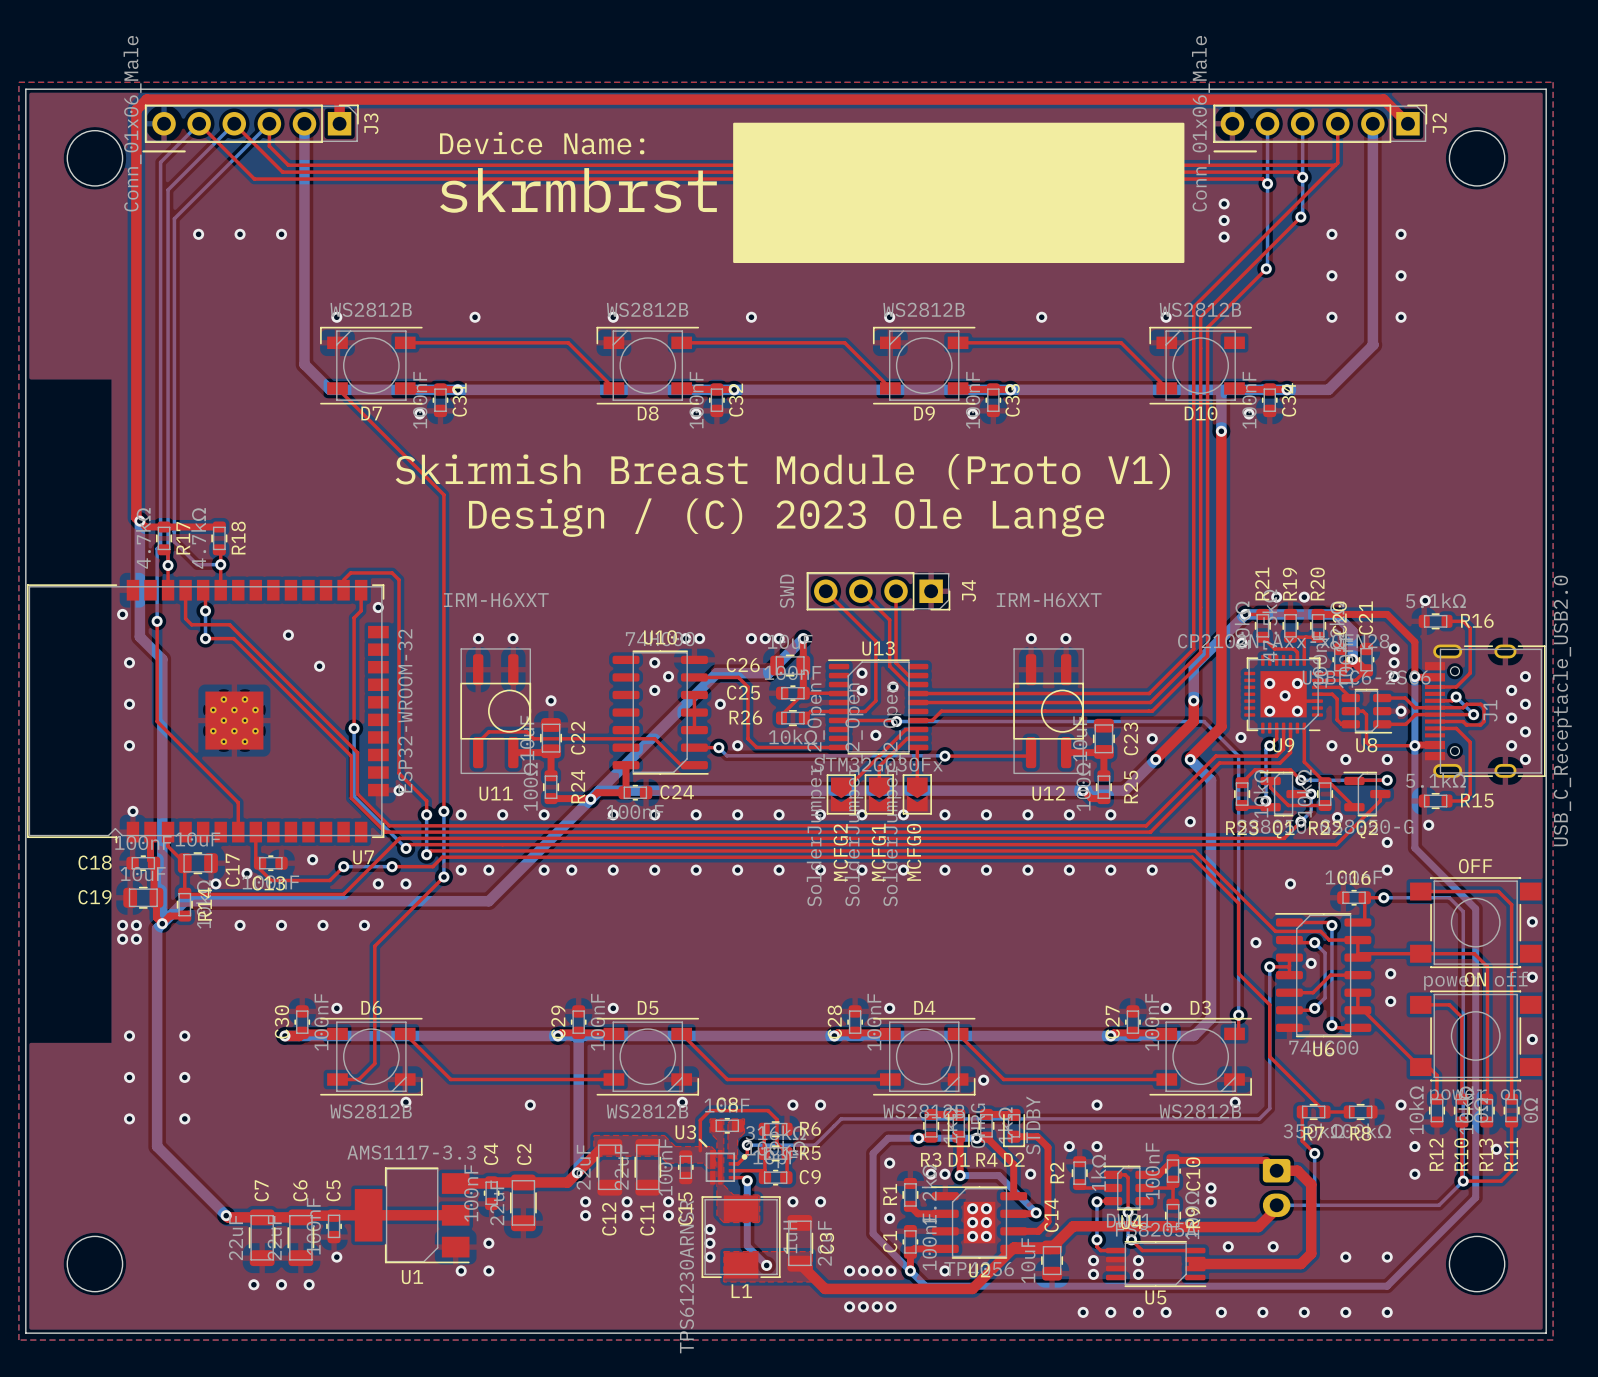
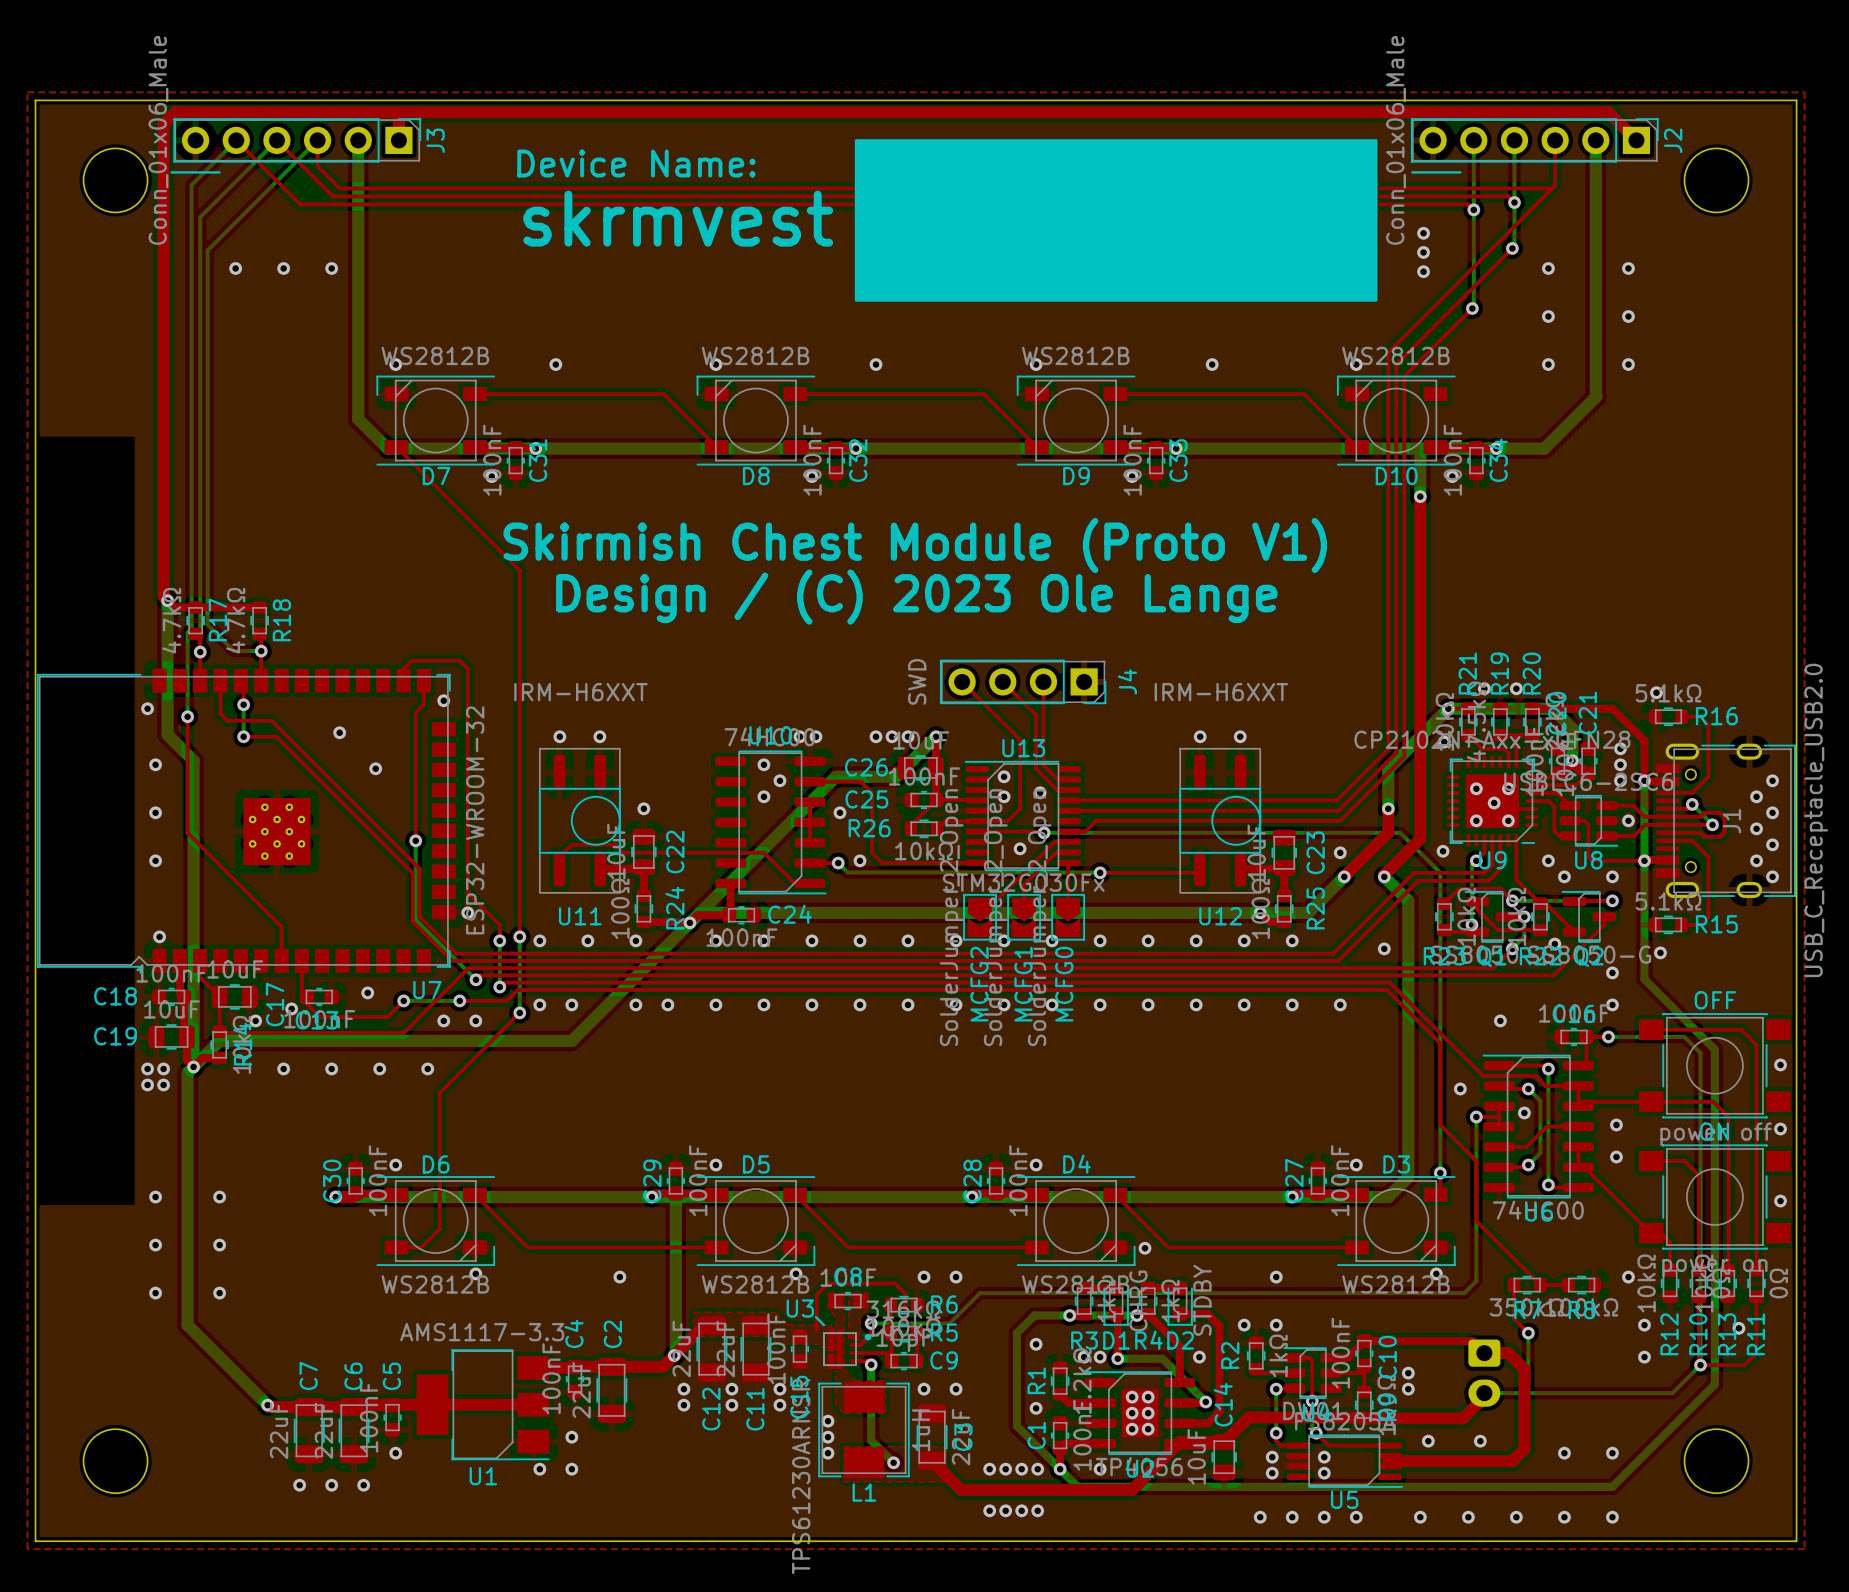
text: skrmbrst (578, 190) -> skrmvest (678, 218)
text: Skirmish Breast Module (Proto V1) (782, 471) -> Skirmish Chest Module (Proto V1) (915, 545)

